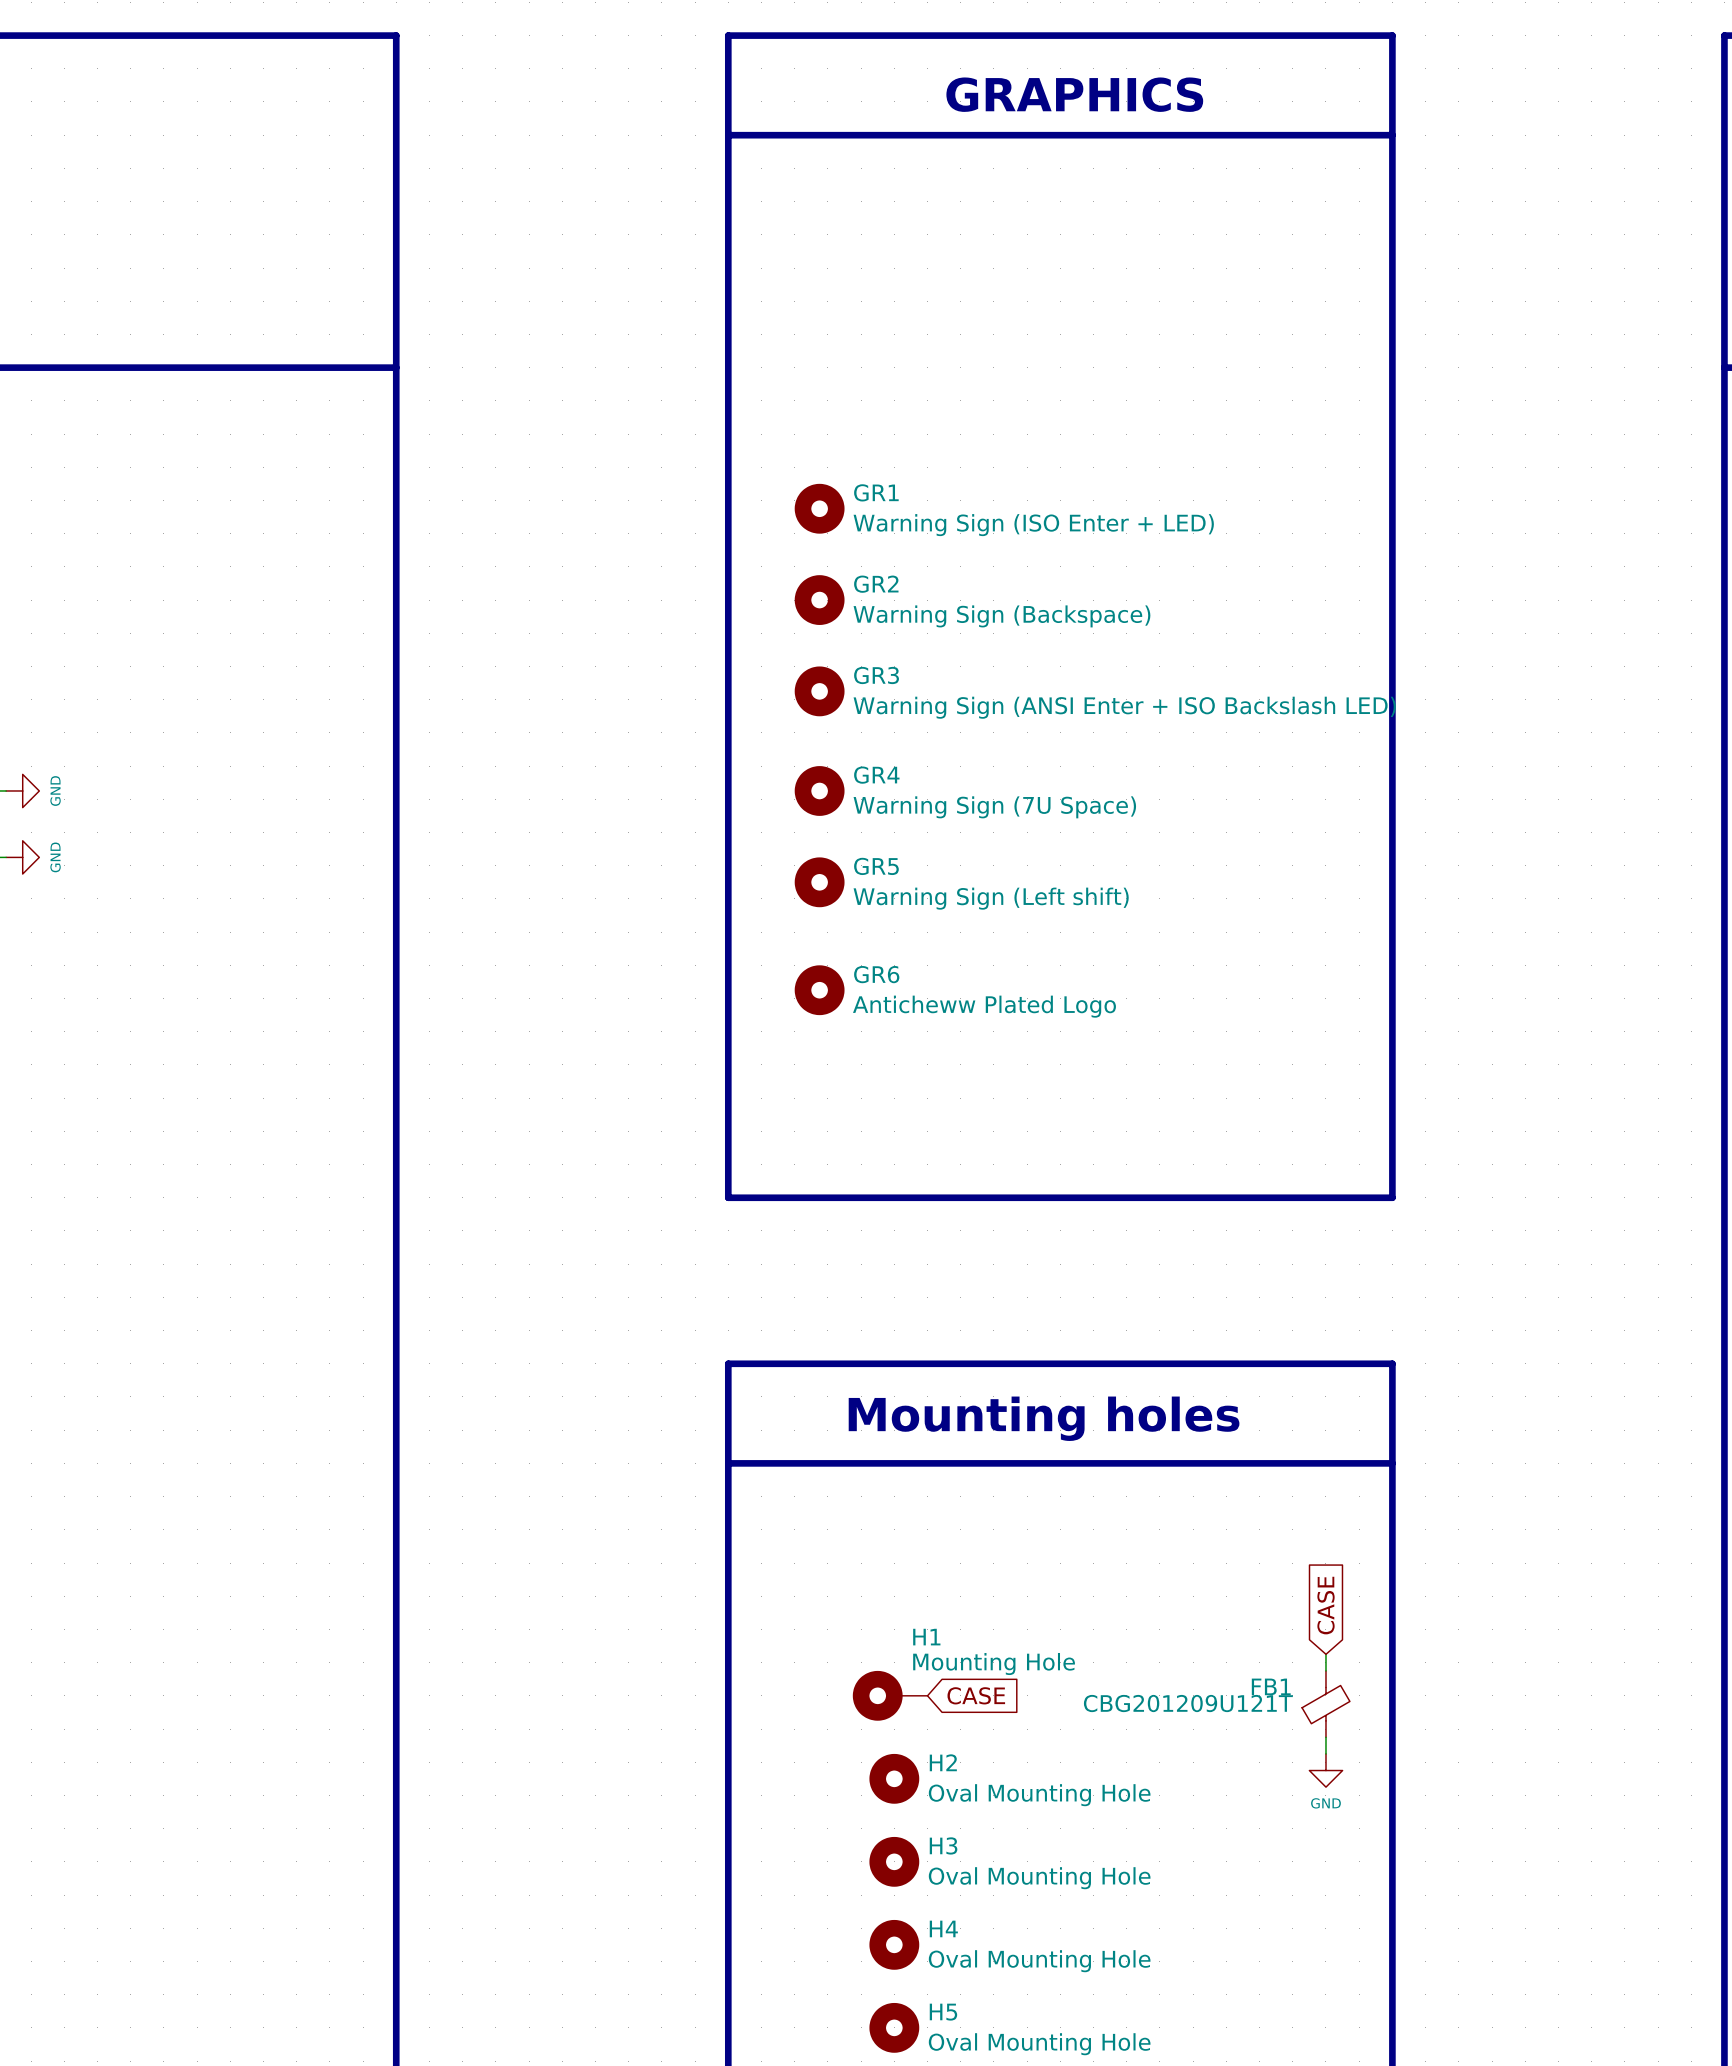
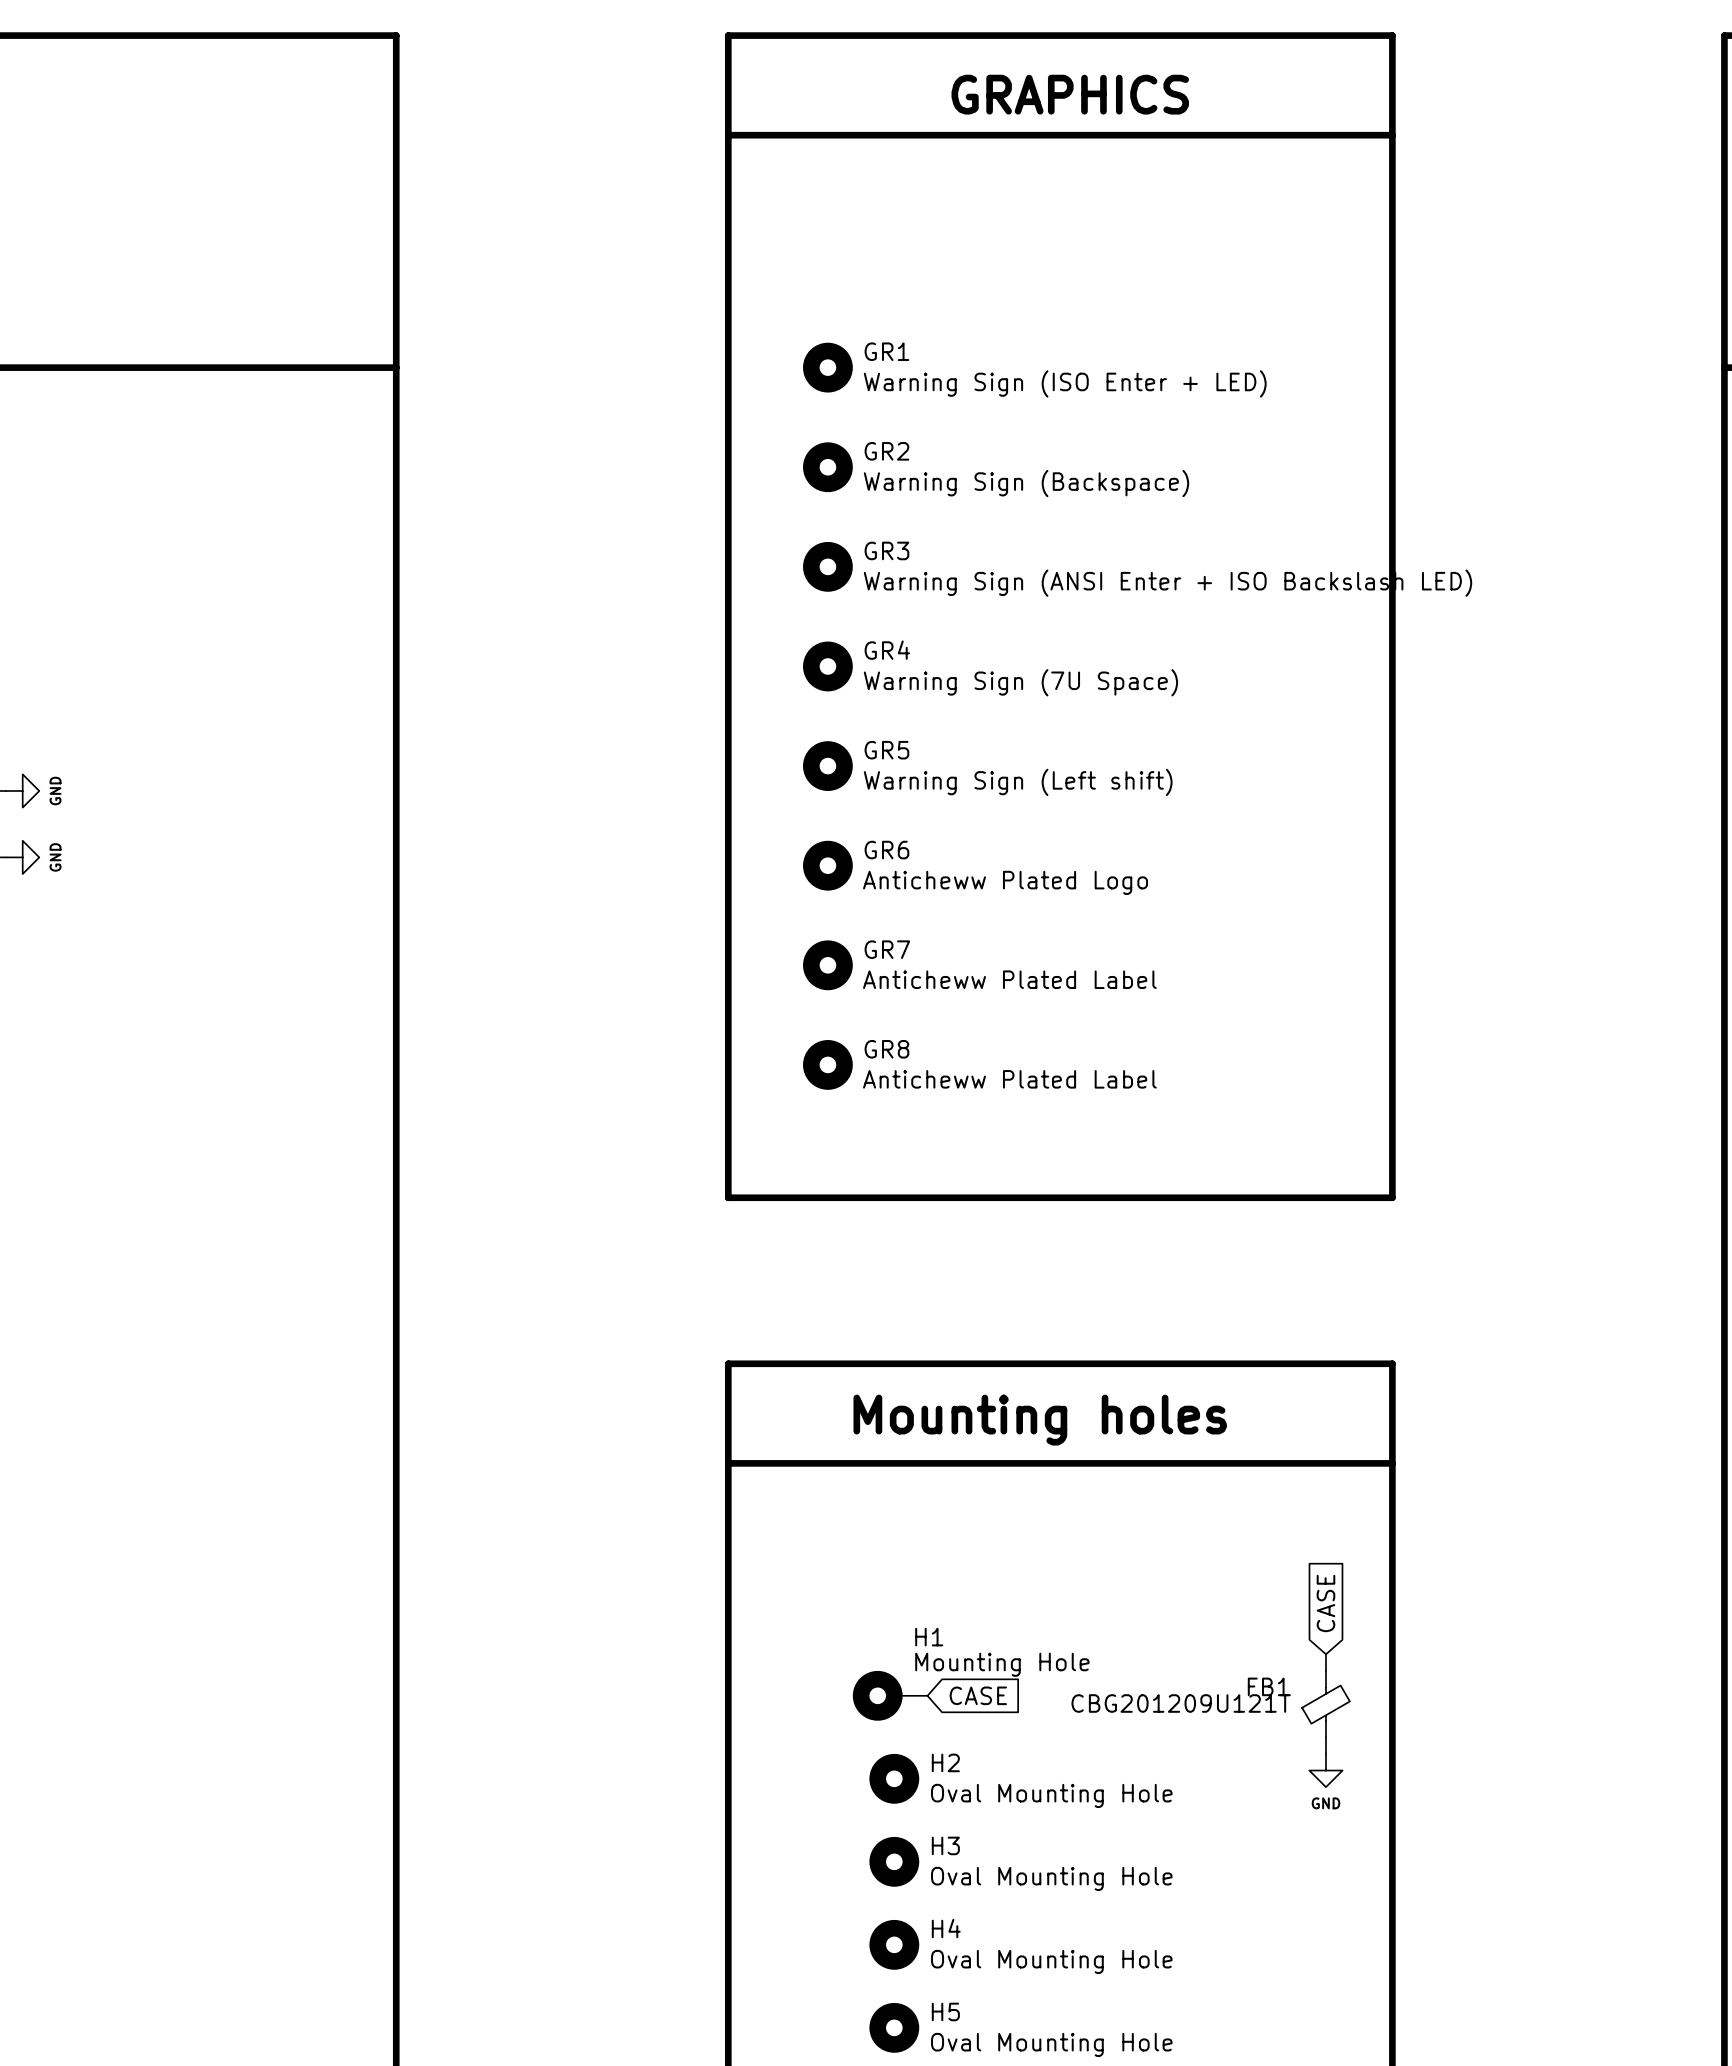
GR1 position: (819, 508) -> (827, 367)
GR2 position: (819, 600) -> (827, 467)
GR3 position: (819, 691) -> (827, 566)
GR4 position: (819, 790) -> (827, 666)
GR5 position: (819, 882) -> (827, 766)
GR7: none -> Anticheww Plated Label (827, 965)
GR6 position: (819, 990) -> (827, 865)
GR8: none -> Anticheww Plated Label (827, 1064)

